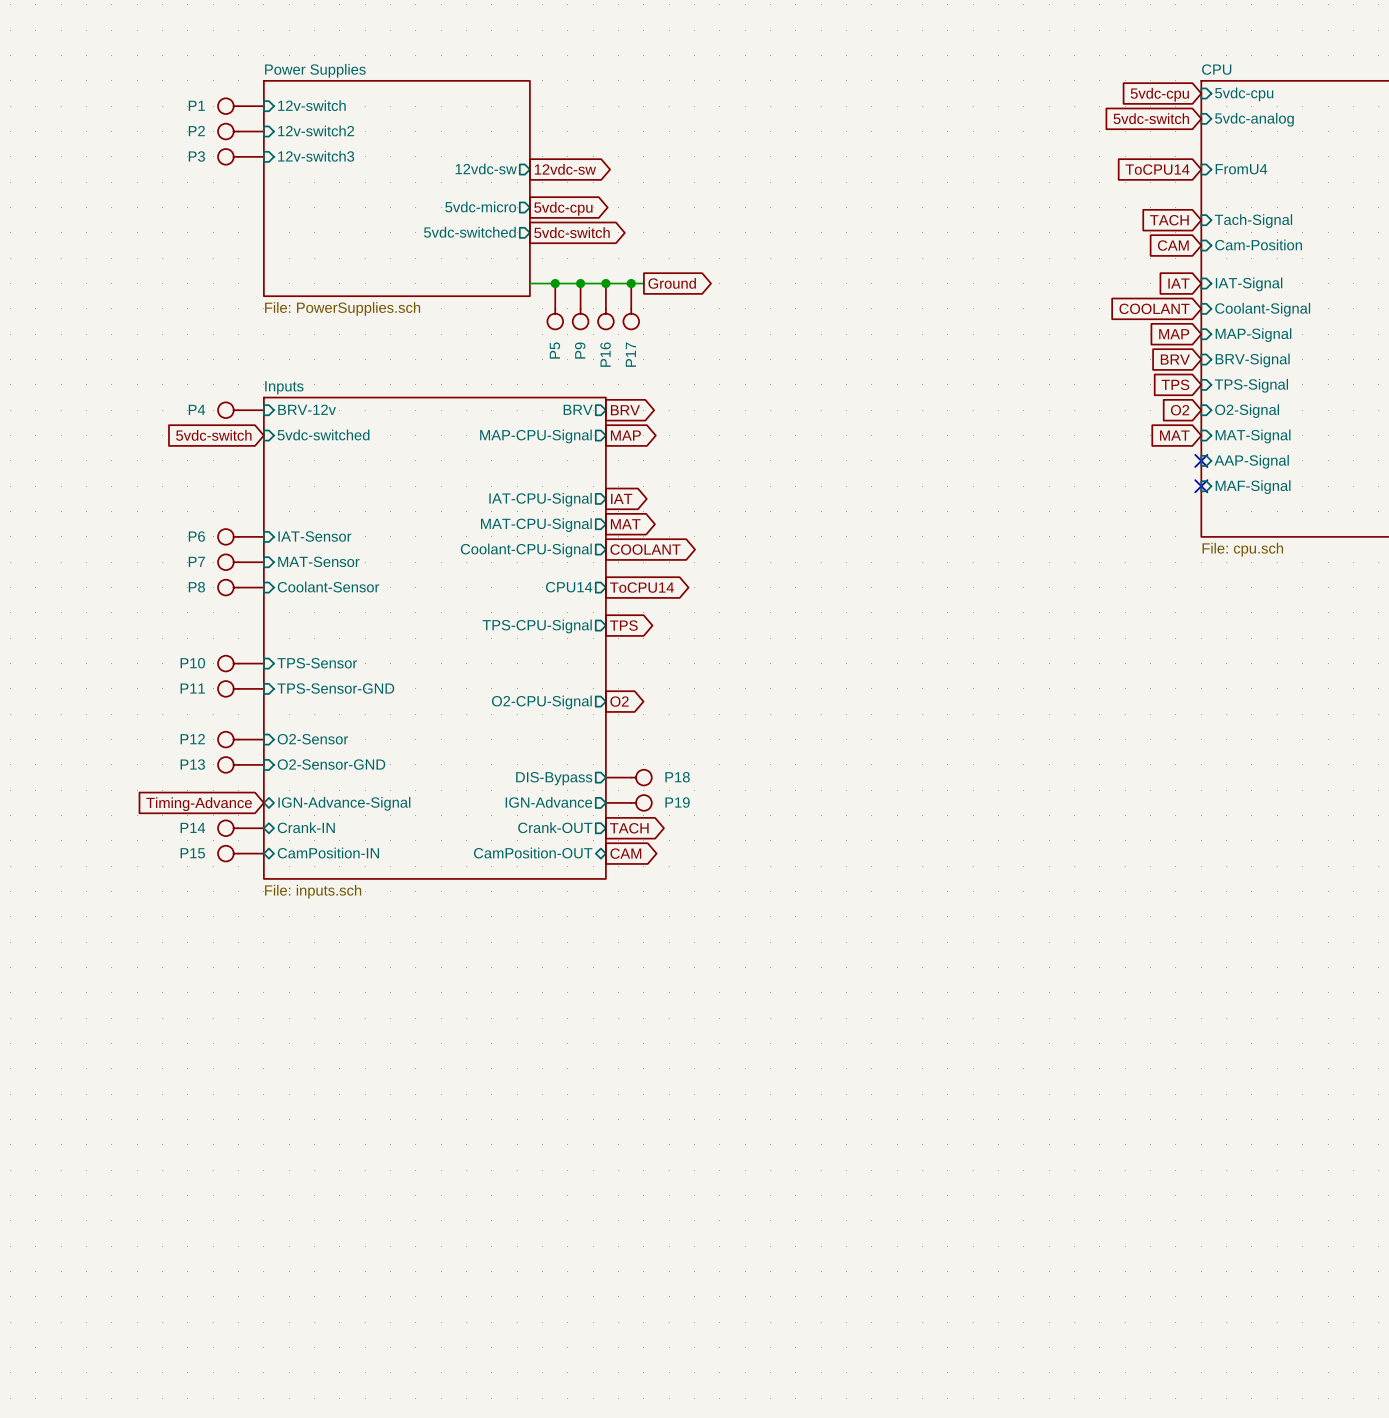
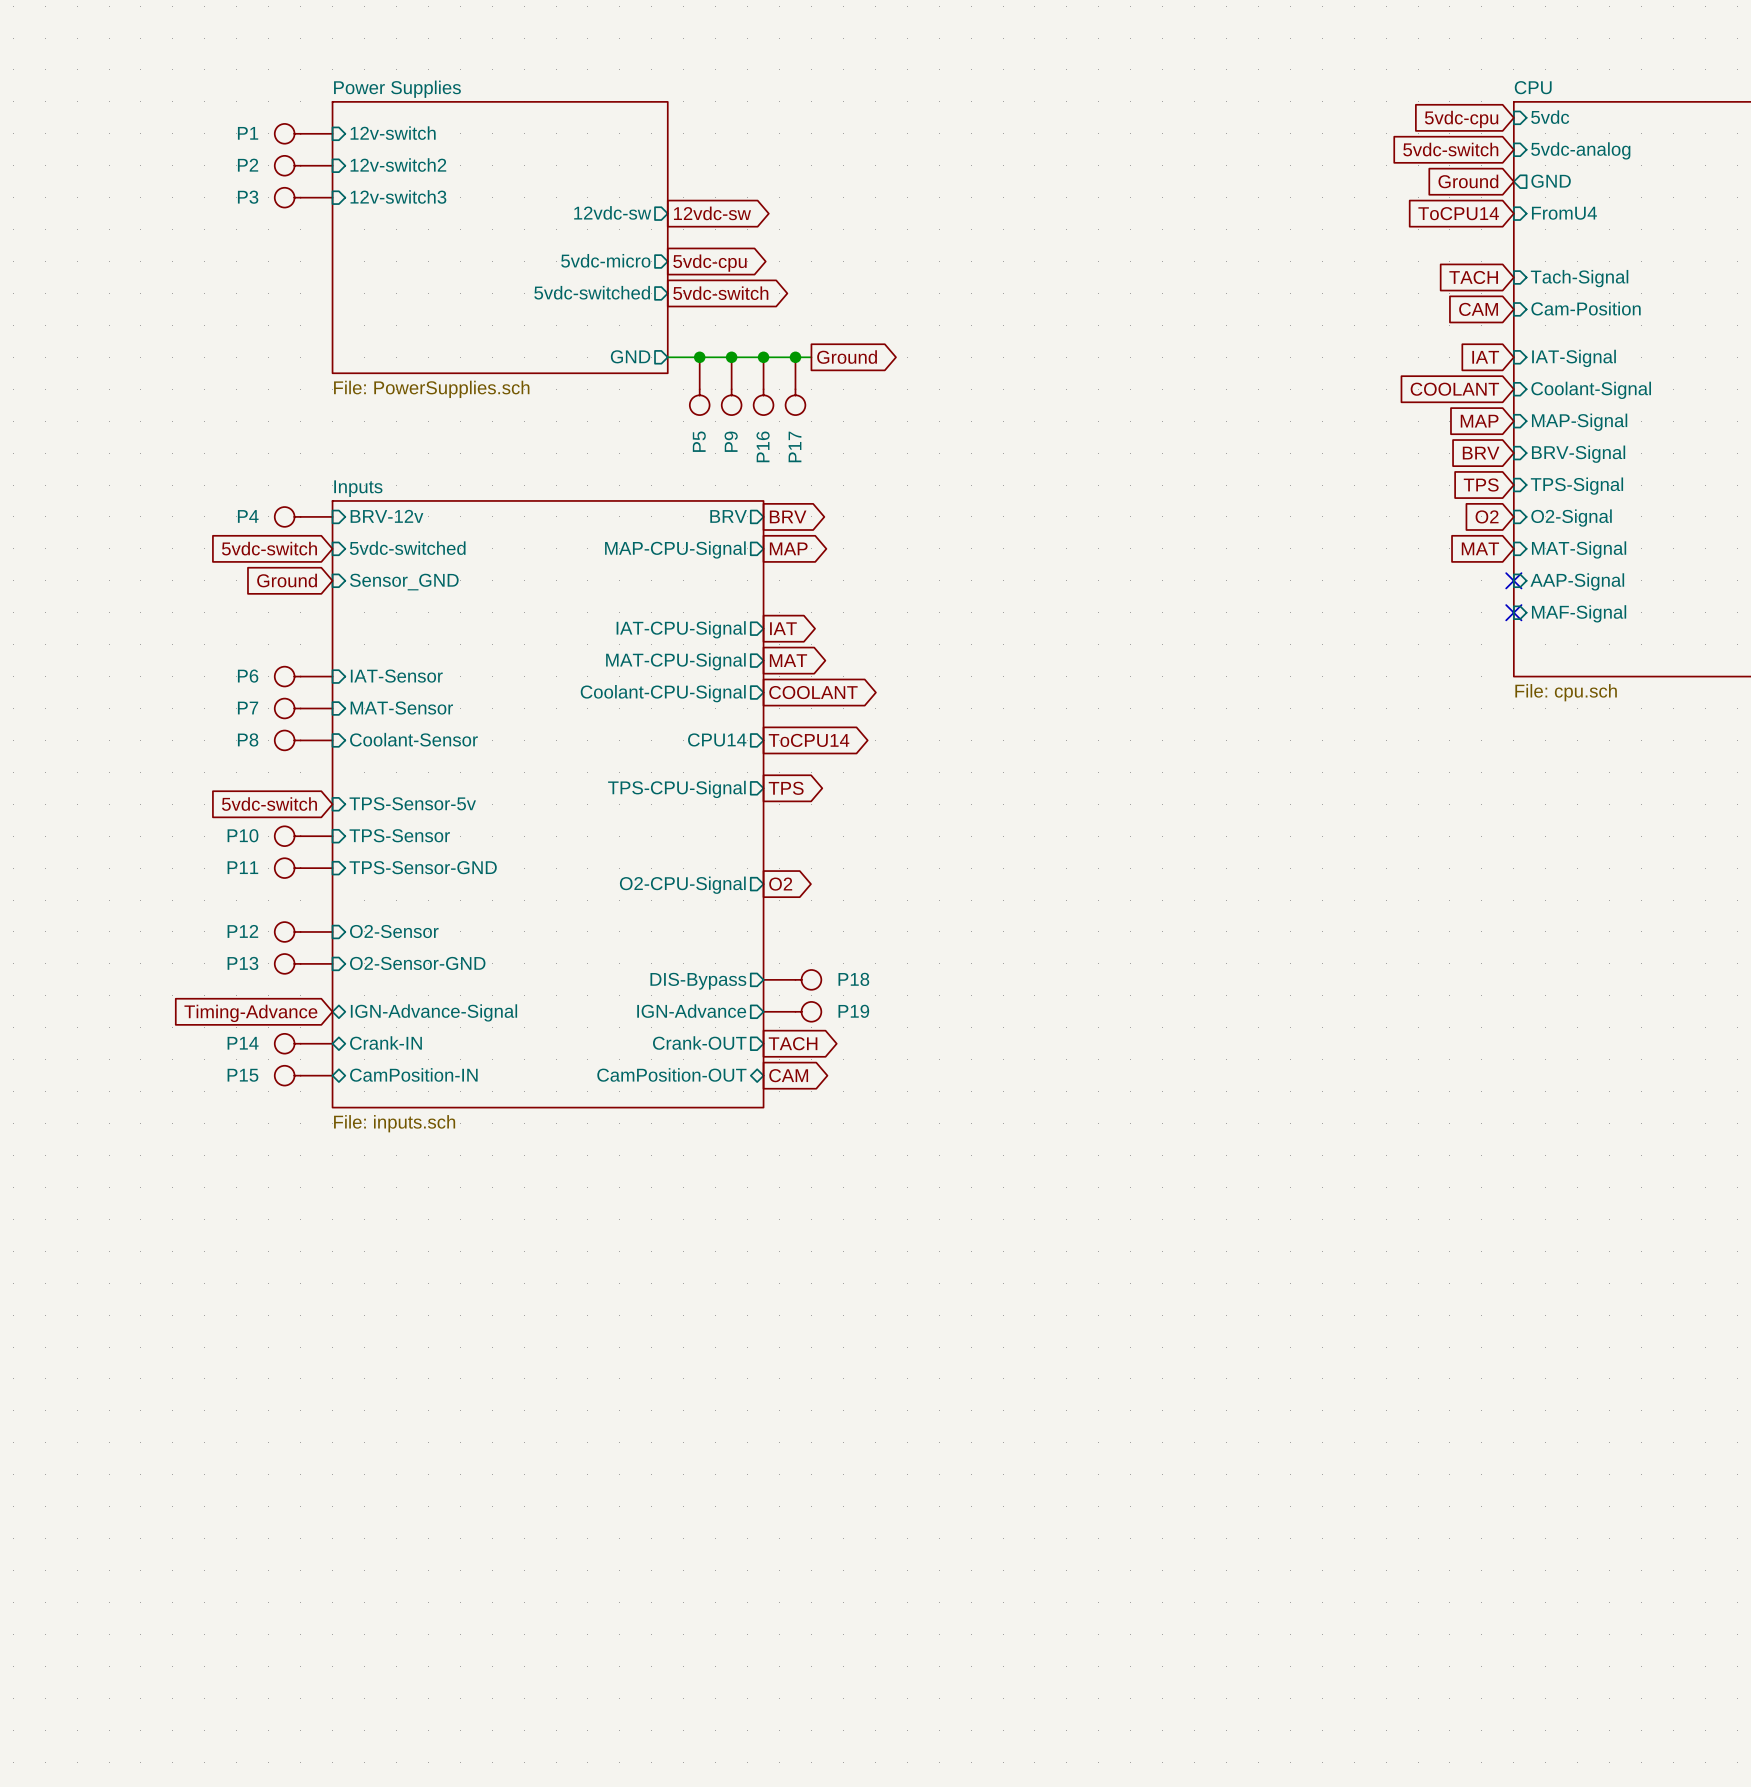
sheet pin: 5vdc-cpu (1244, 94) -> 5vdc (1550, 117)
global label: none -> Ground (1468, 181)
sheet pin: none -> GND (1551, 181)
sheet pin: none -> GND (630, 356)
global label: none -> Ground (287, 580)
sheet pin: none -> Sensor_GND (404, 582)
sheet pin: none -> TPS-Sensor-5v (412, 803)
global label: none -> 5vdc-switch (269, 804)

